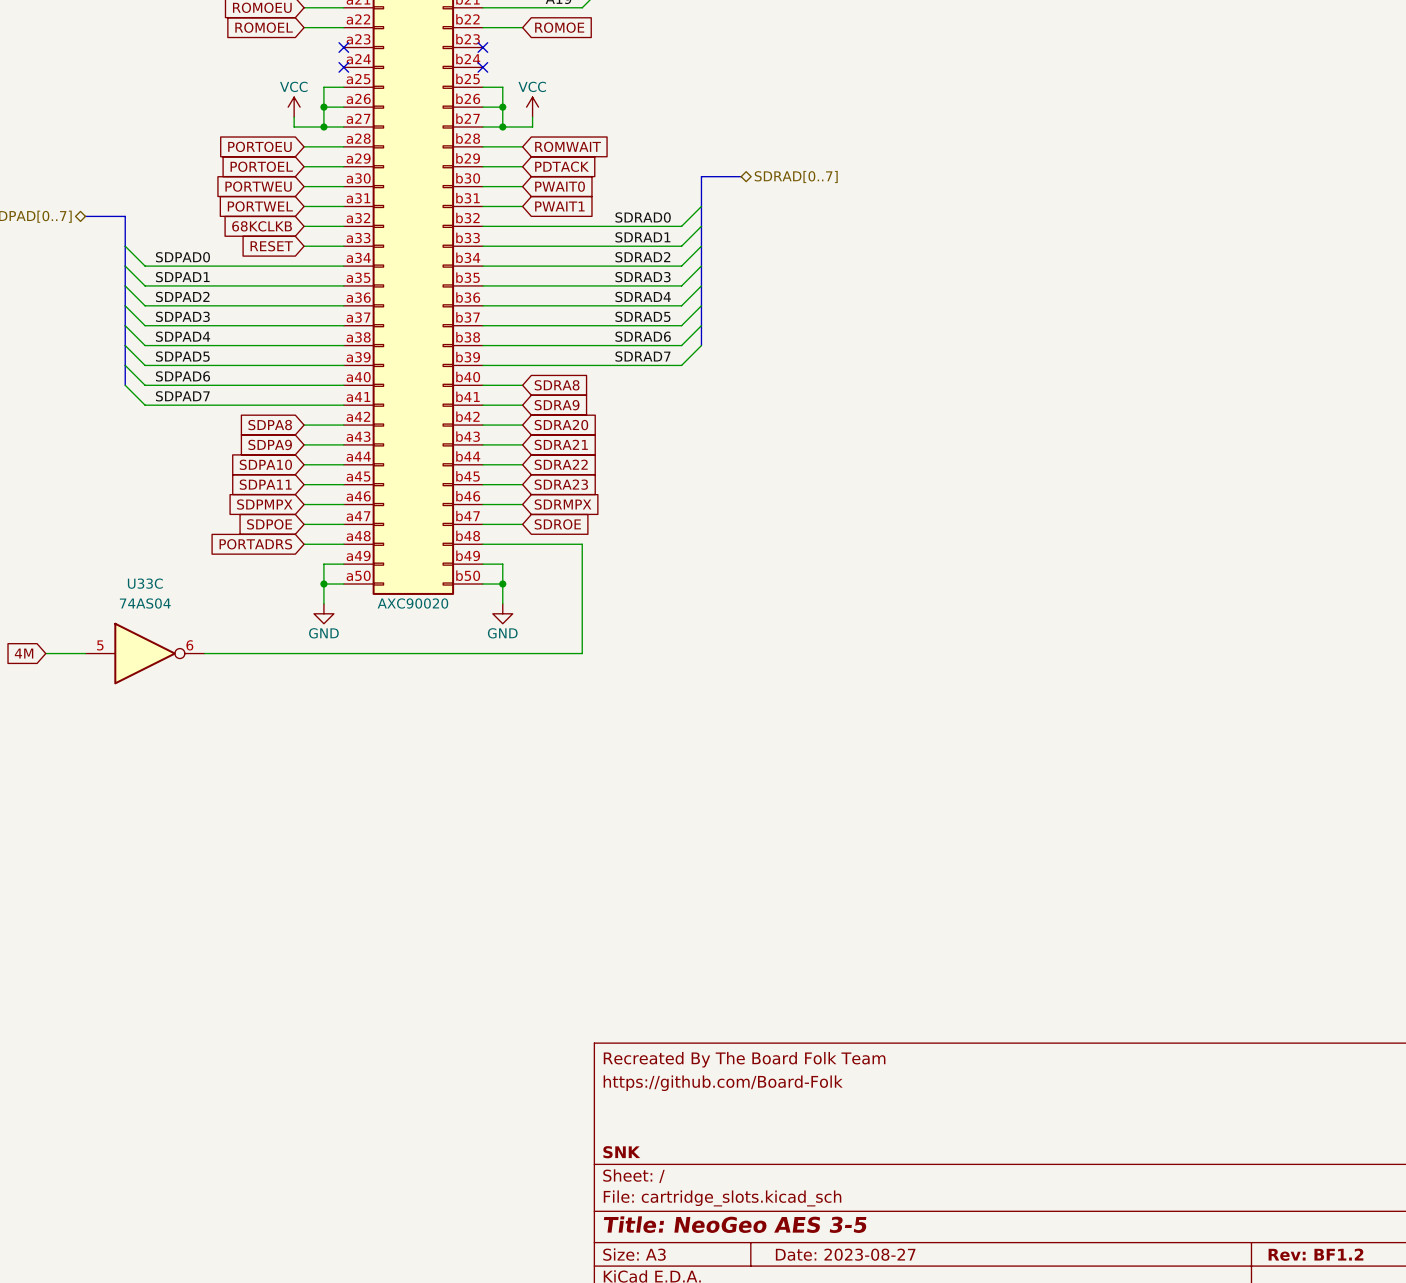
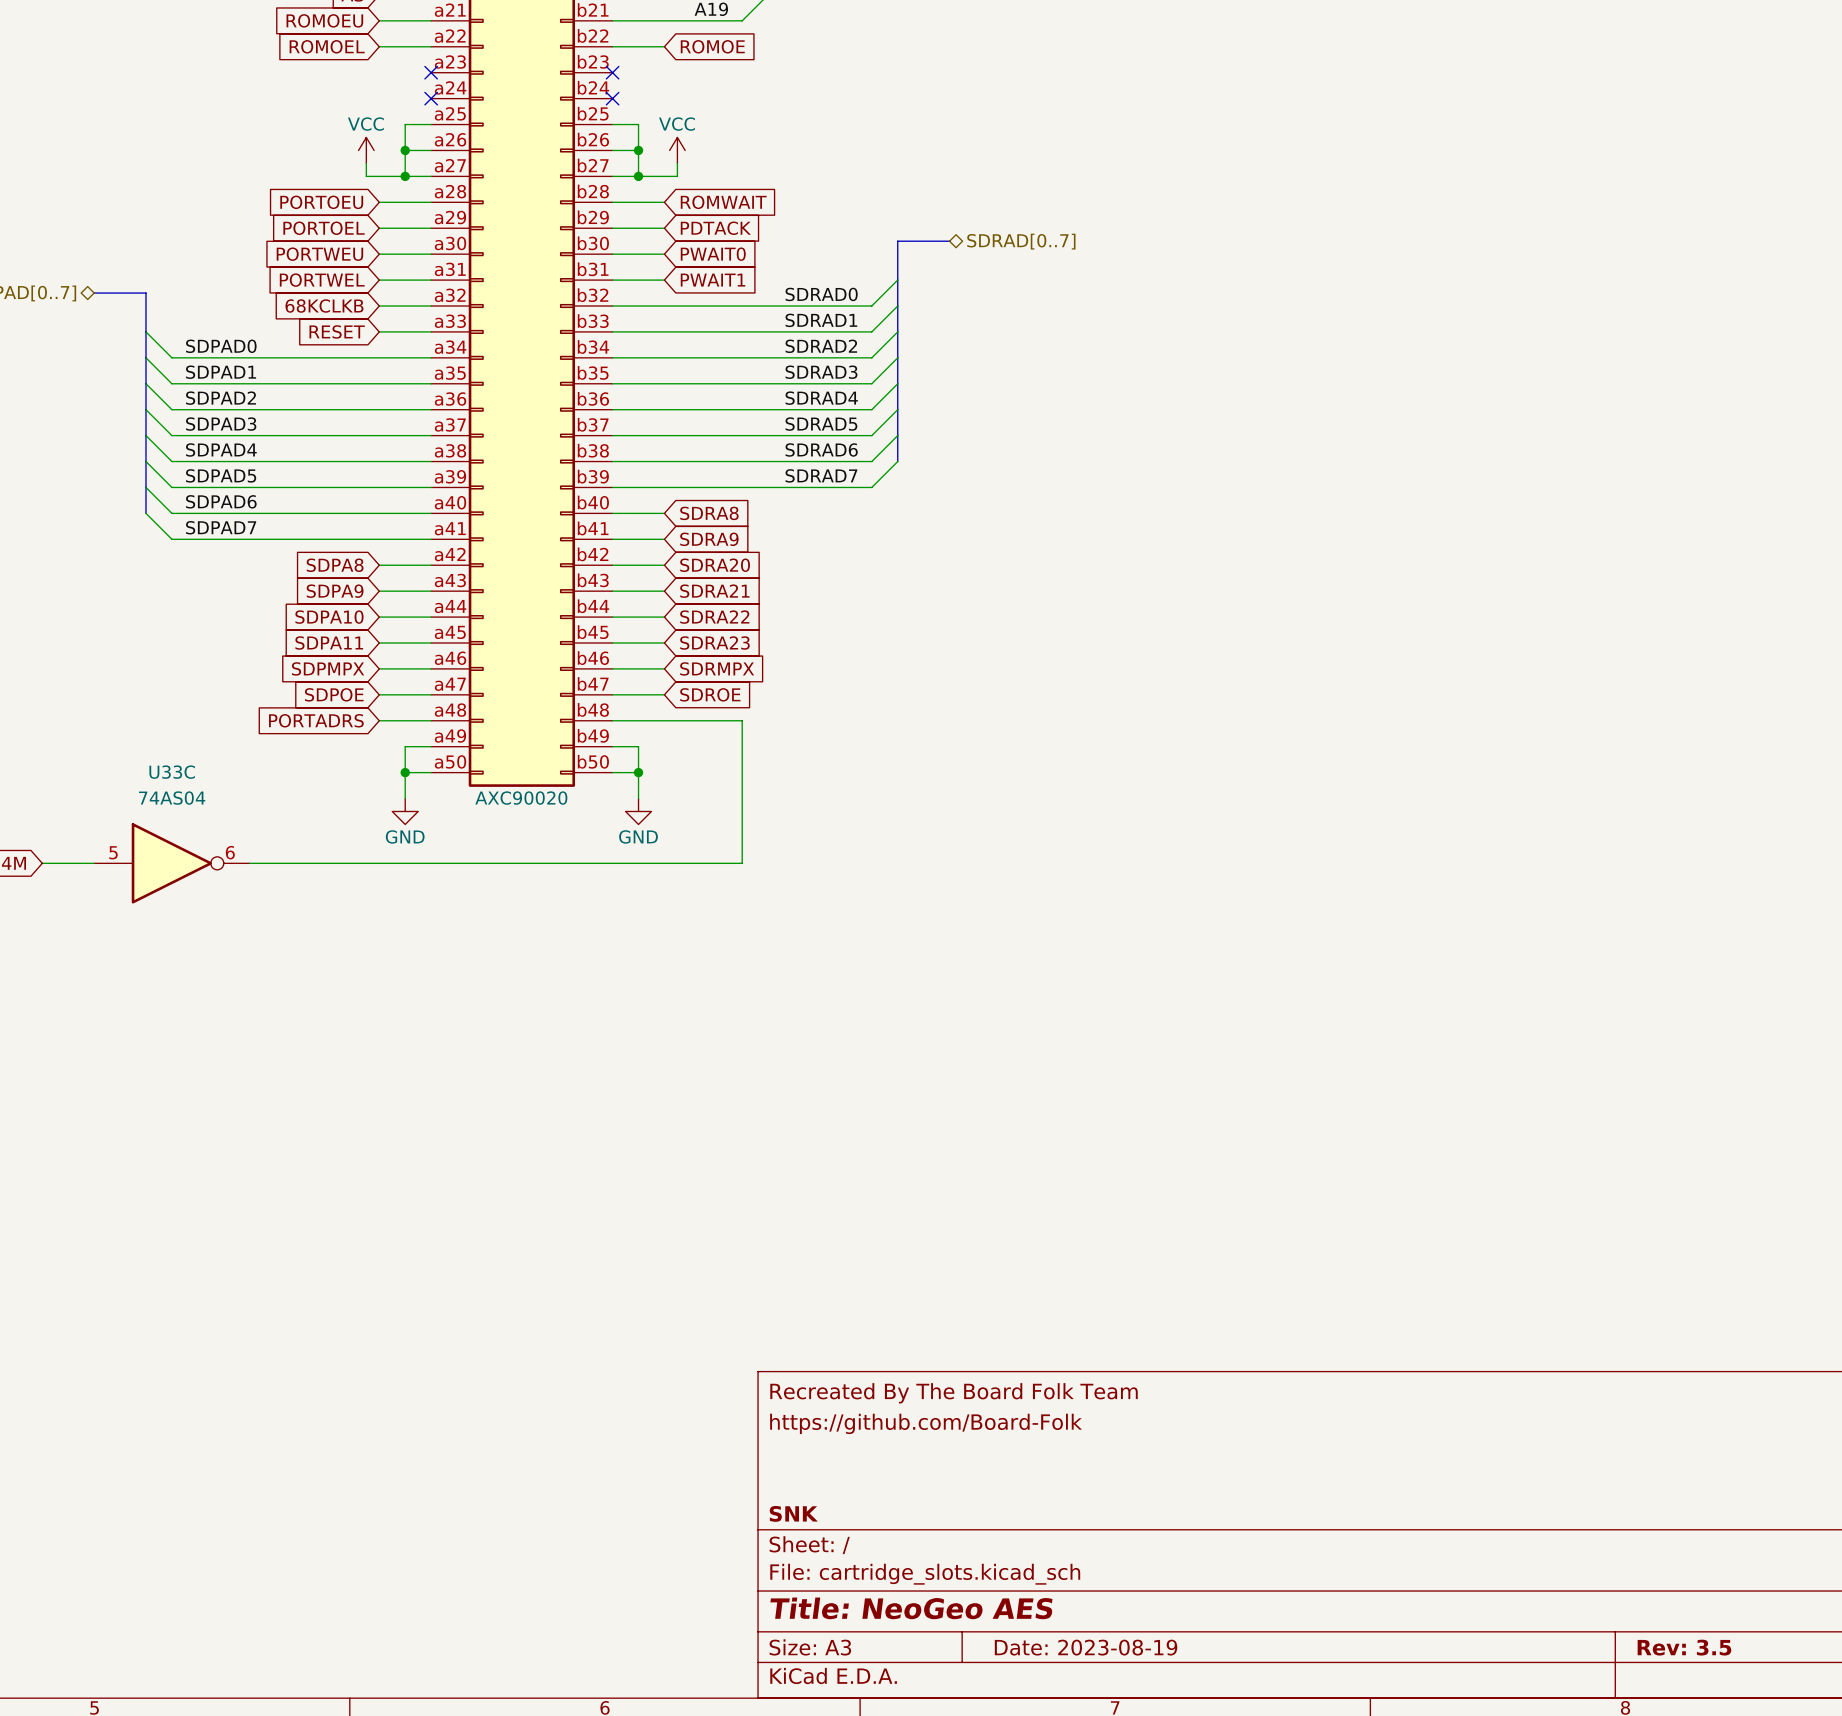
title block: Title: NeoGeo AES 3-5 (735, 1224) -> Title: NeoGeo AES (911, 1608)
title block: Date: 2023-08-27 (845, 1254) -> Date: 2023-08-19 (1086, 1647)
title block: Rev: BF1.2 (1315, 1254) -> Rev: 3.5 (1684, 1647)

